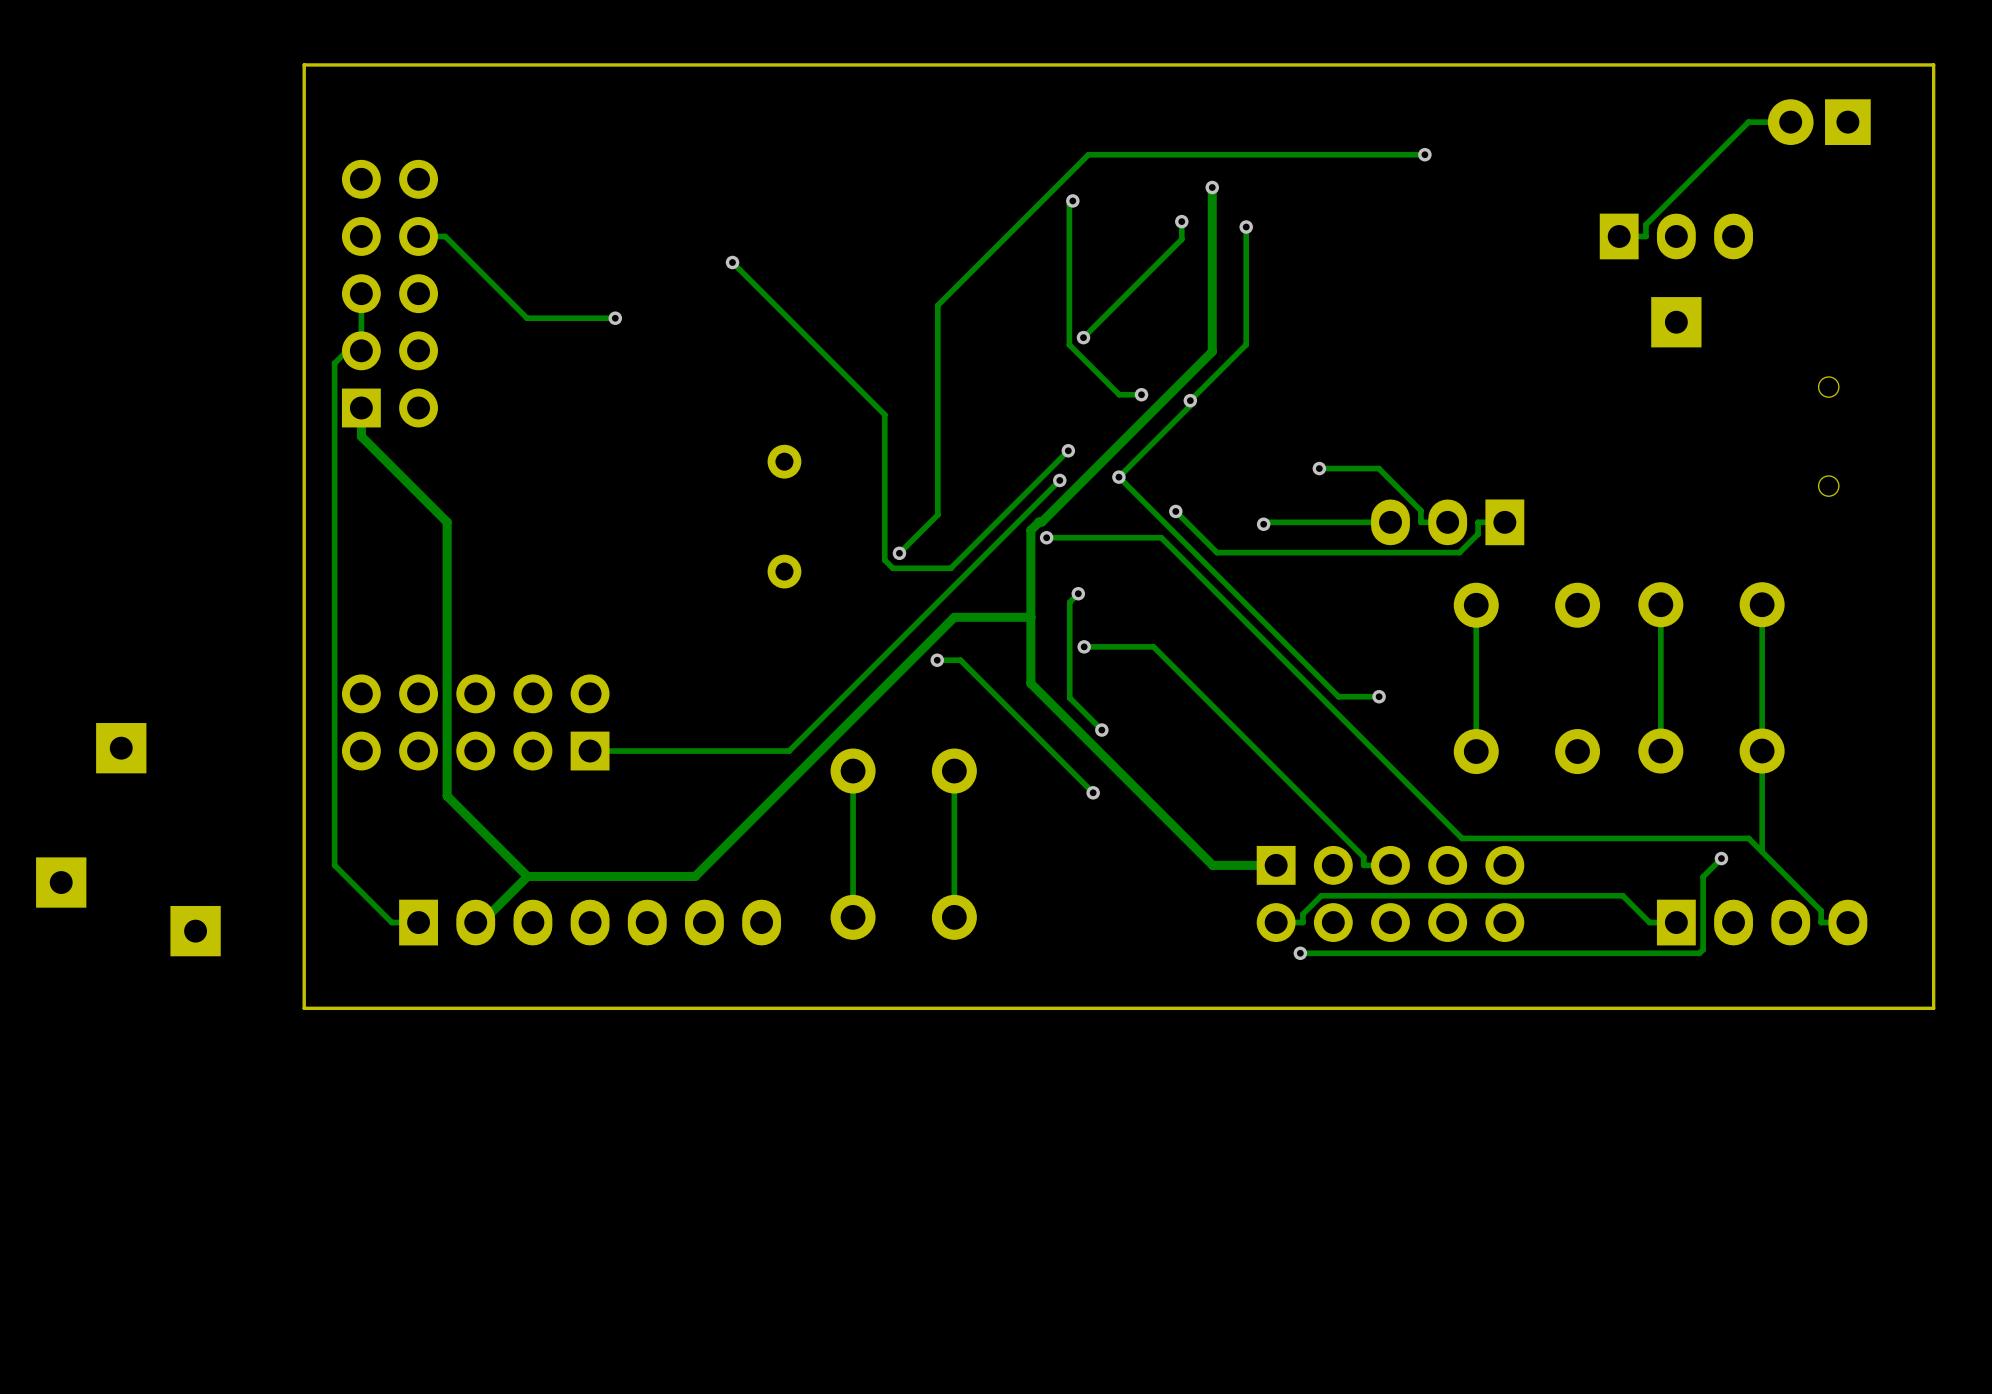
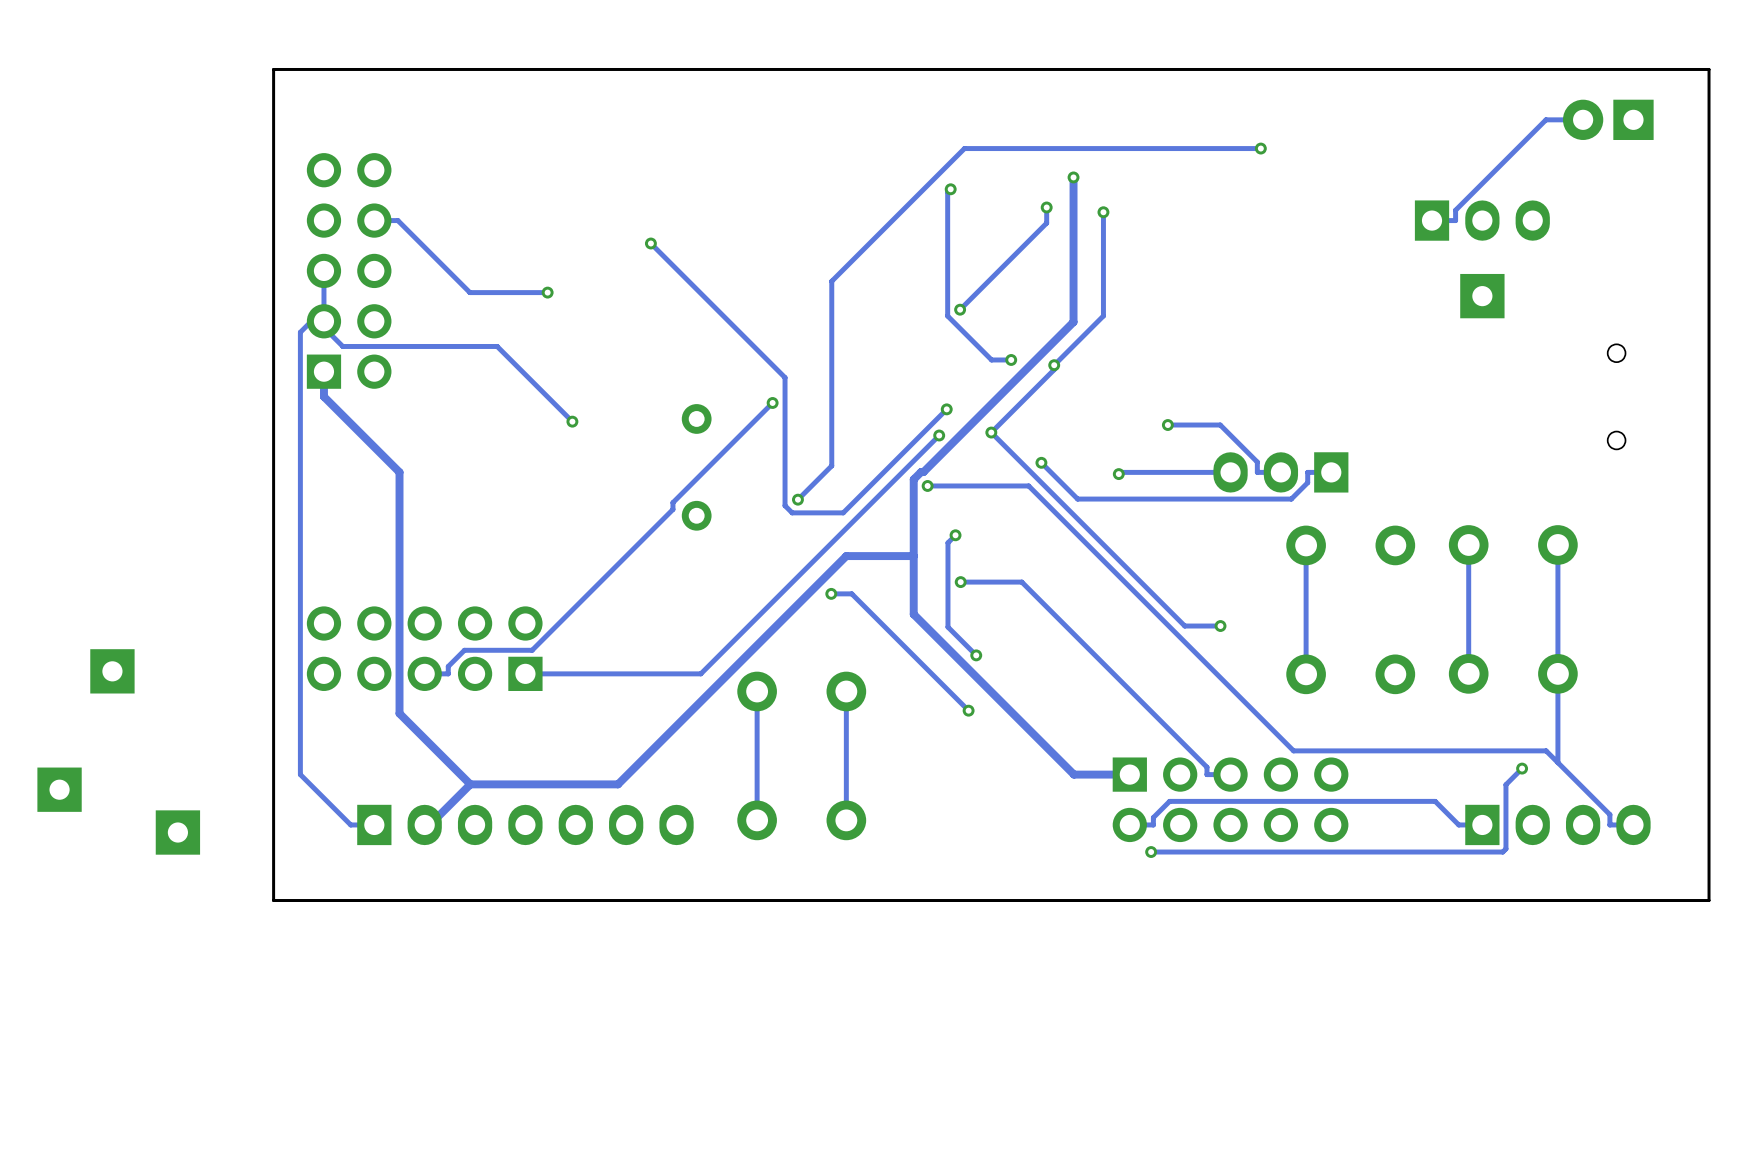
track: none -> (317, 321) (342, 346) (497, 346) (572, 421)
track: none -> (772, 402) (672, 502) (672, 509) (532, 650) (464, 650) (448, 666) (448, 673) (424, 673)
via: none -> (772, 402)
via: none -> (572, 421)

